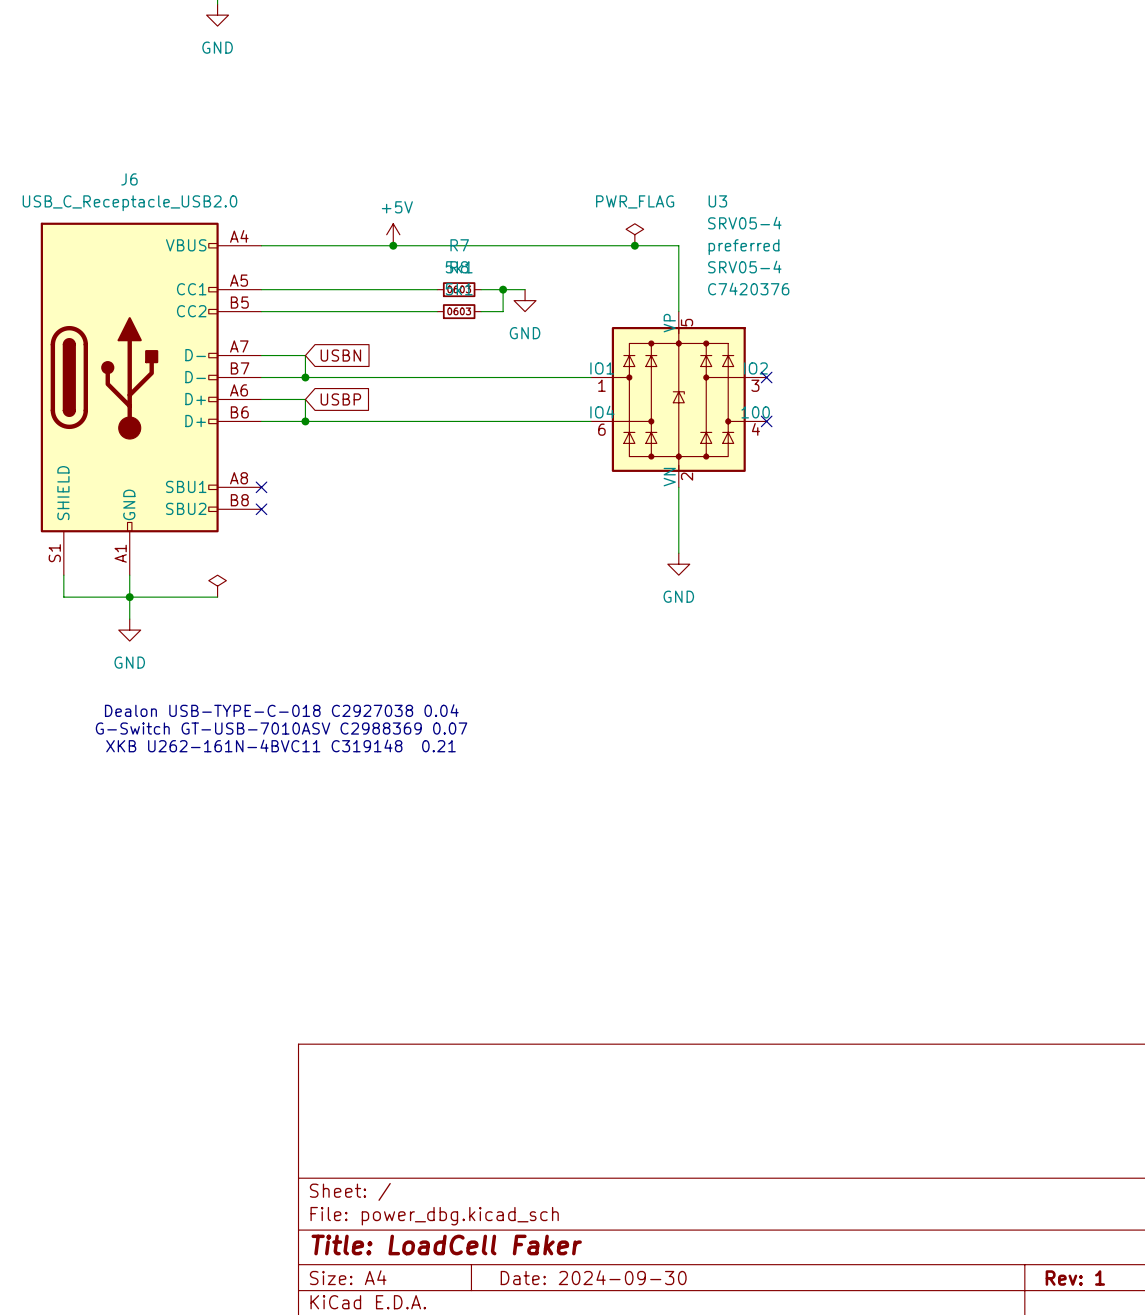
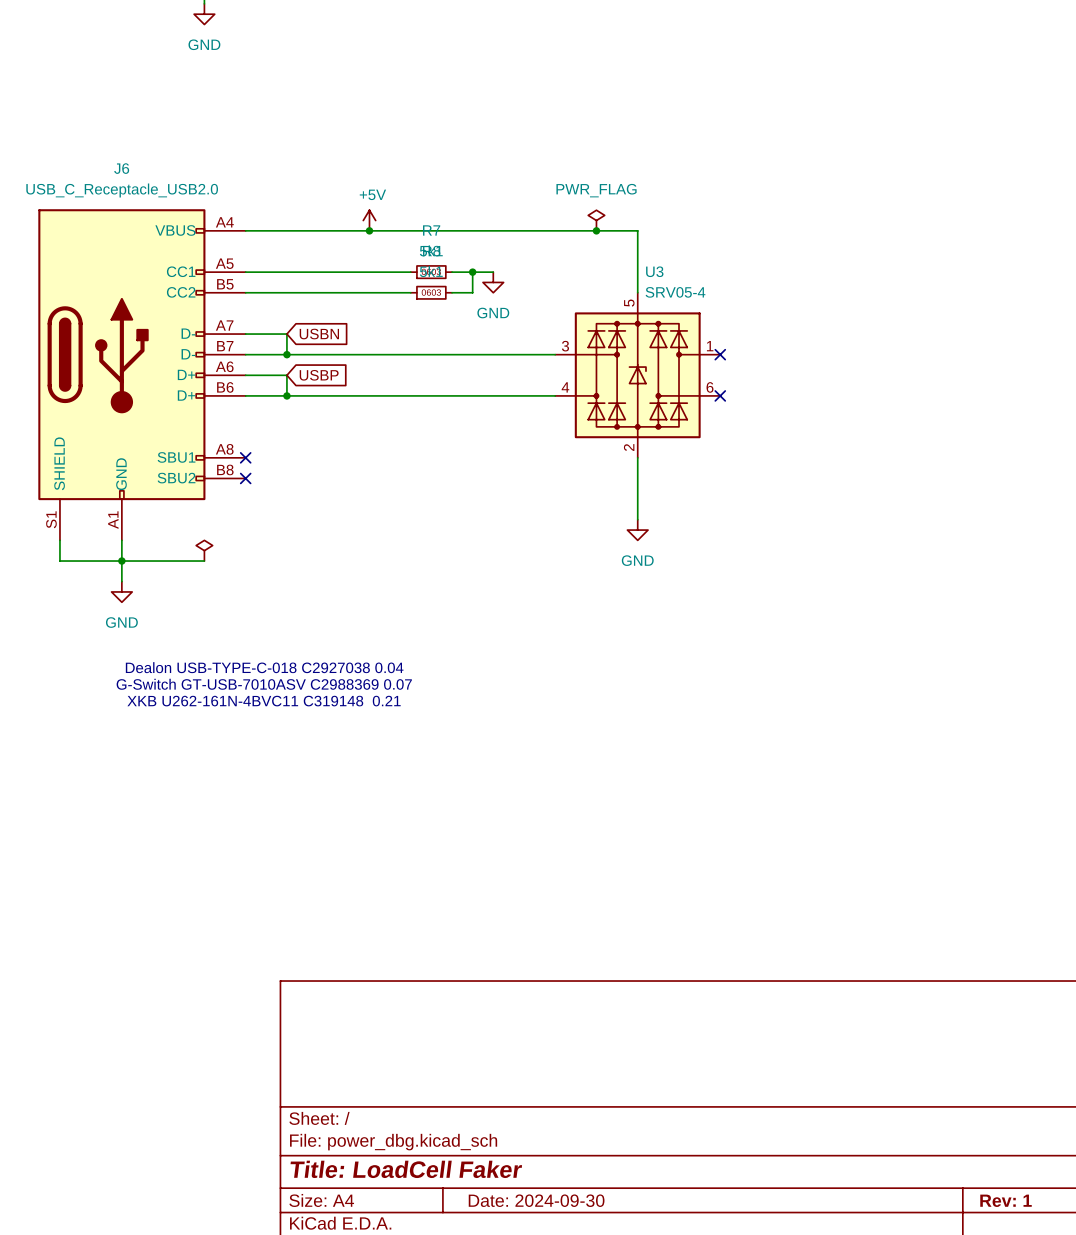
U3 name position: U3 (717, 201) -> U3 (654, 271)
U3 value position: SRV05-4 (744, 223) -> SRV05-4 (675, 292)
U3 text: preferred (744, 247) -> none
U3 text: SRV05-4 (744, 267) -> none
U3 text: C7420376 (748, 288) -> none
U3 symbol: [590, 311, 767, 488] -> [555, 292, 721, 458]

